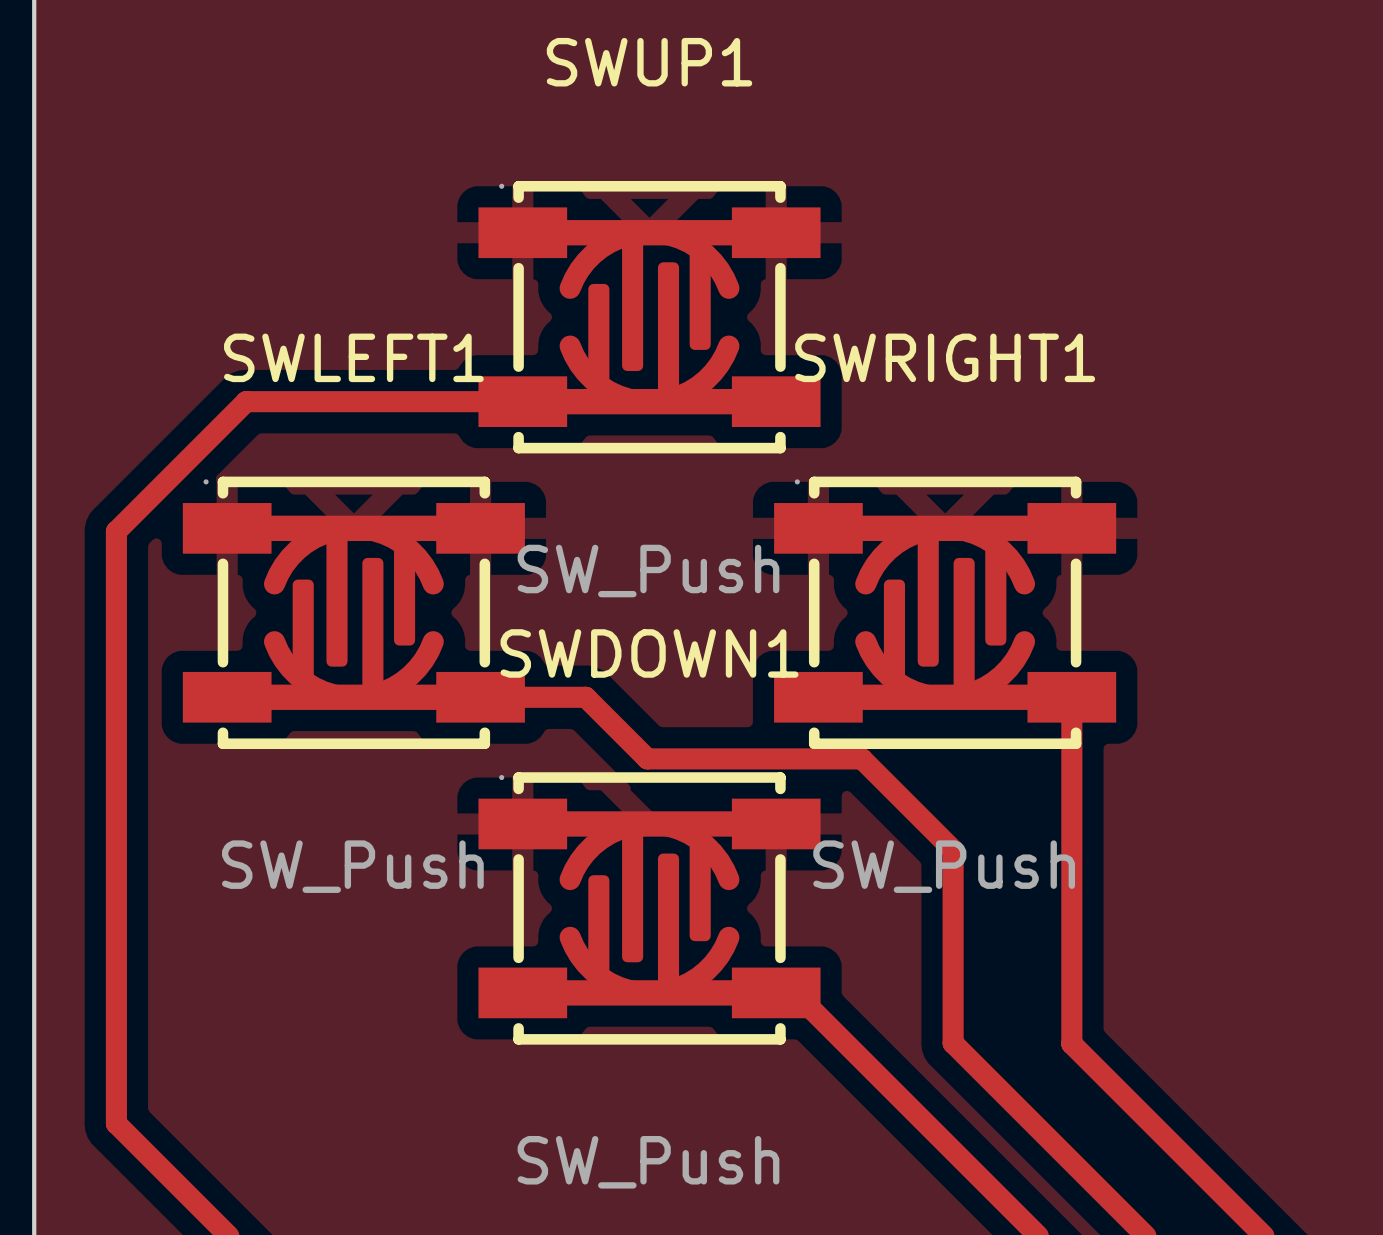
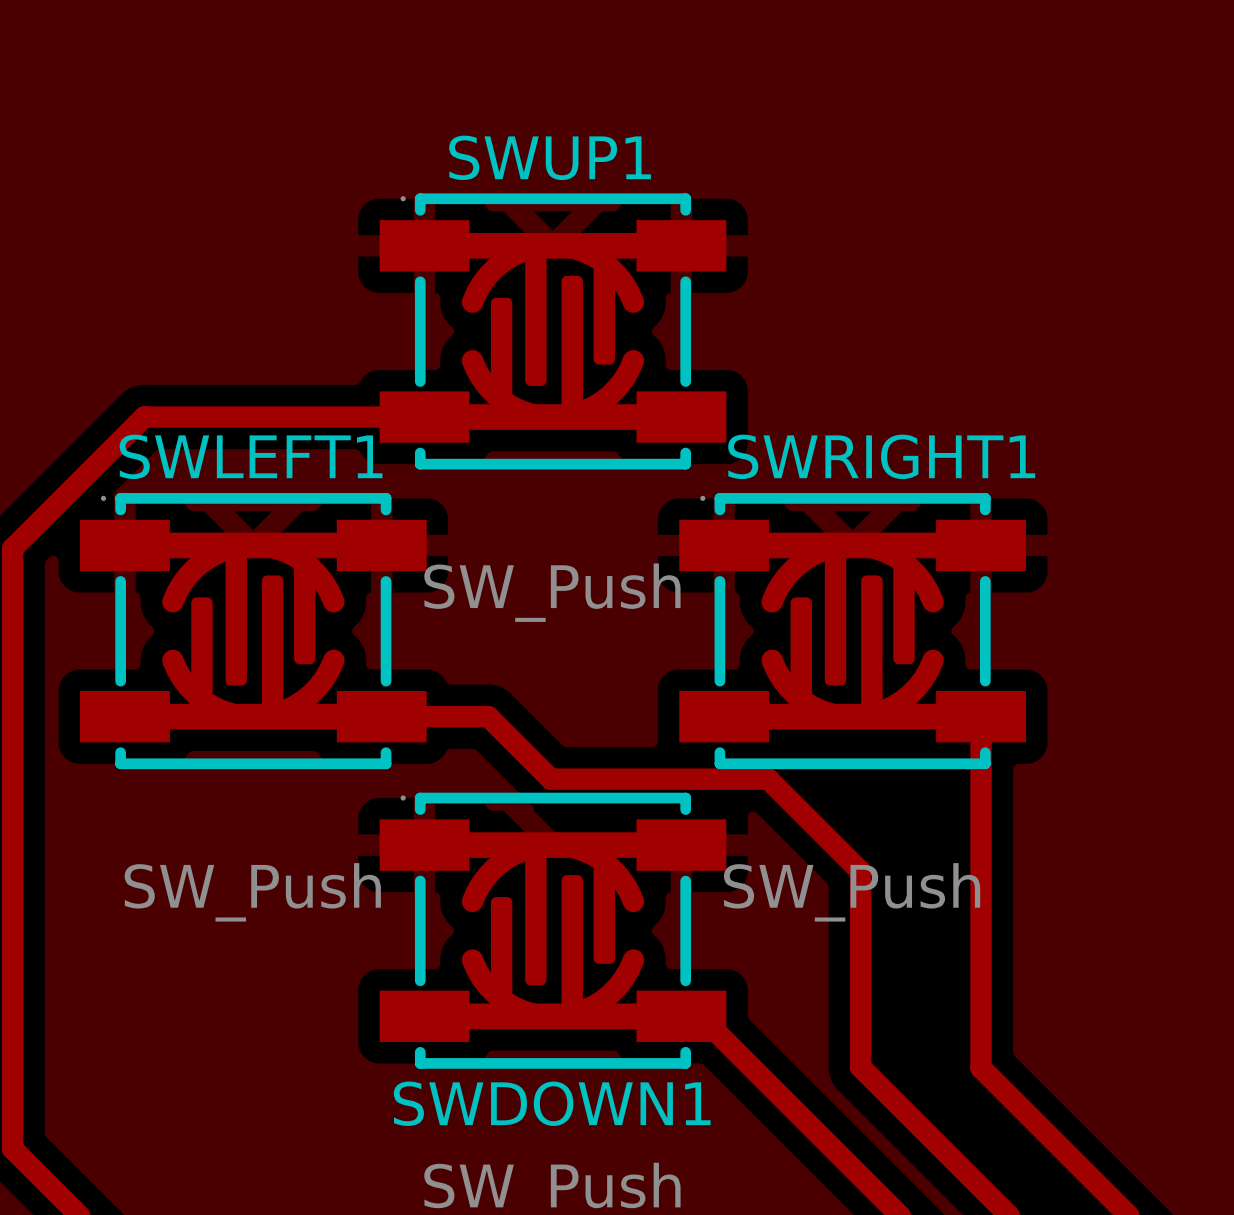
SWUP1 name position: SWUP1 (649, 62) -> SWUP1 (550, 157)
SWLEFT1 name position: SWLEFT1 (353, 357) -> SWLEFT1 (251, 456)
SWRIGHT1 name position: SWRIGHT1 (945, 357) -> SWRIGHT1 (881, 456)
SWDOWN1 name position: SWDOWN1 (649, 653) -> SWDOWN1 (552, 1103)

